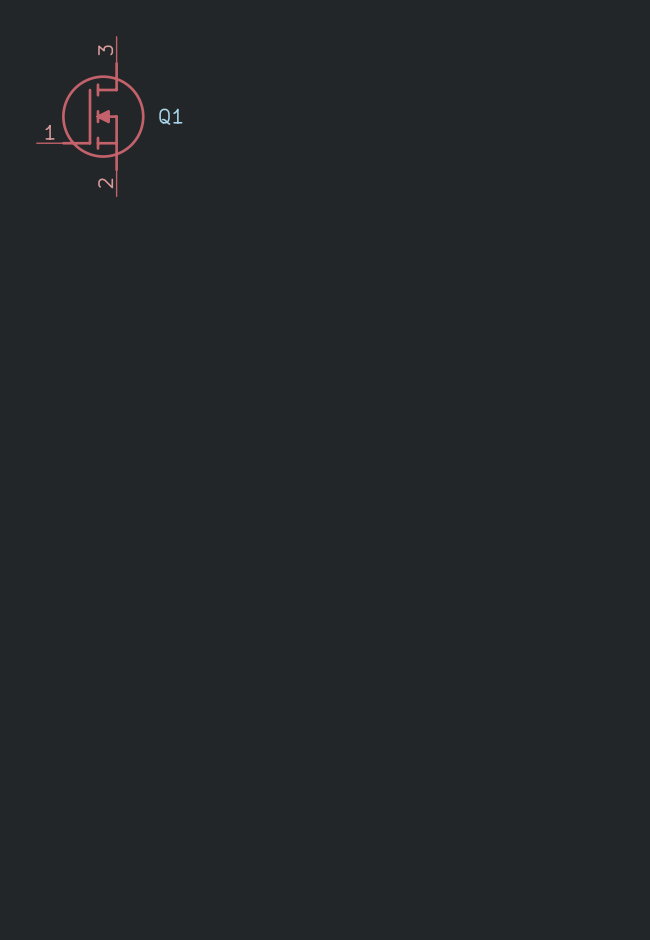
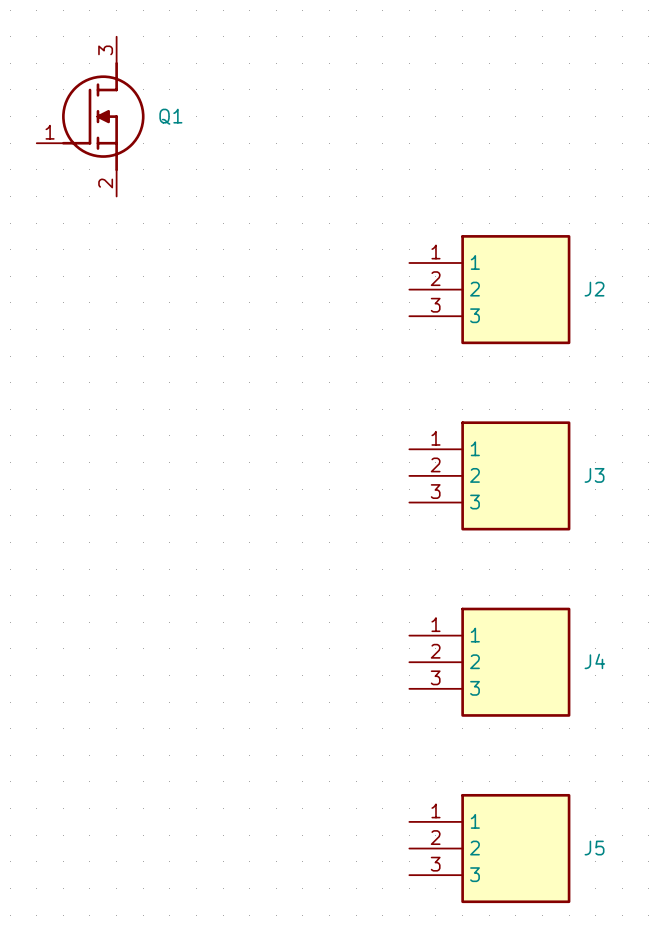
J2: none -> (489, 289)
J3: none -> (489, 475)
J4: none -> (489, 662)
J5: none -> (489, 848)

